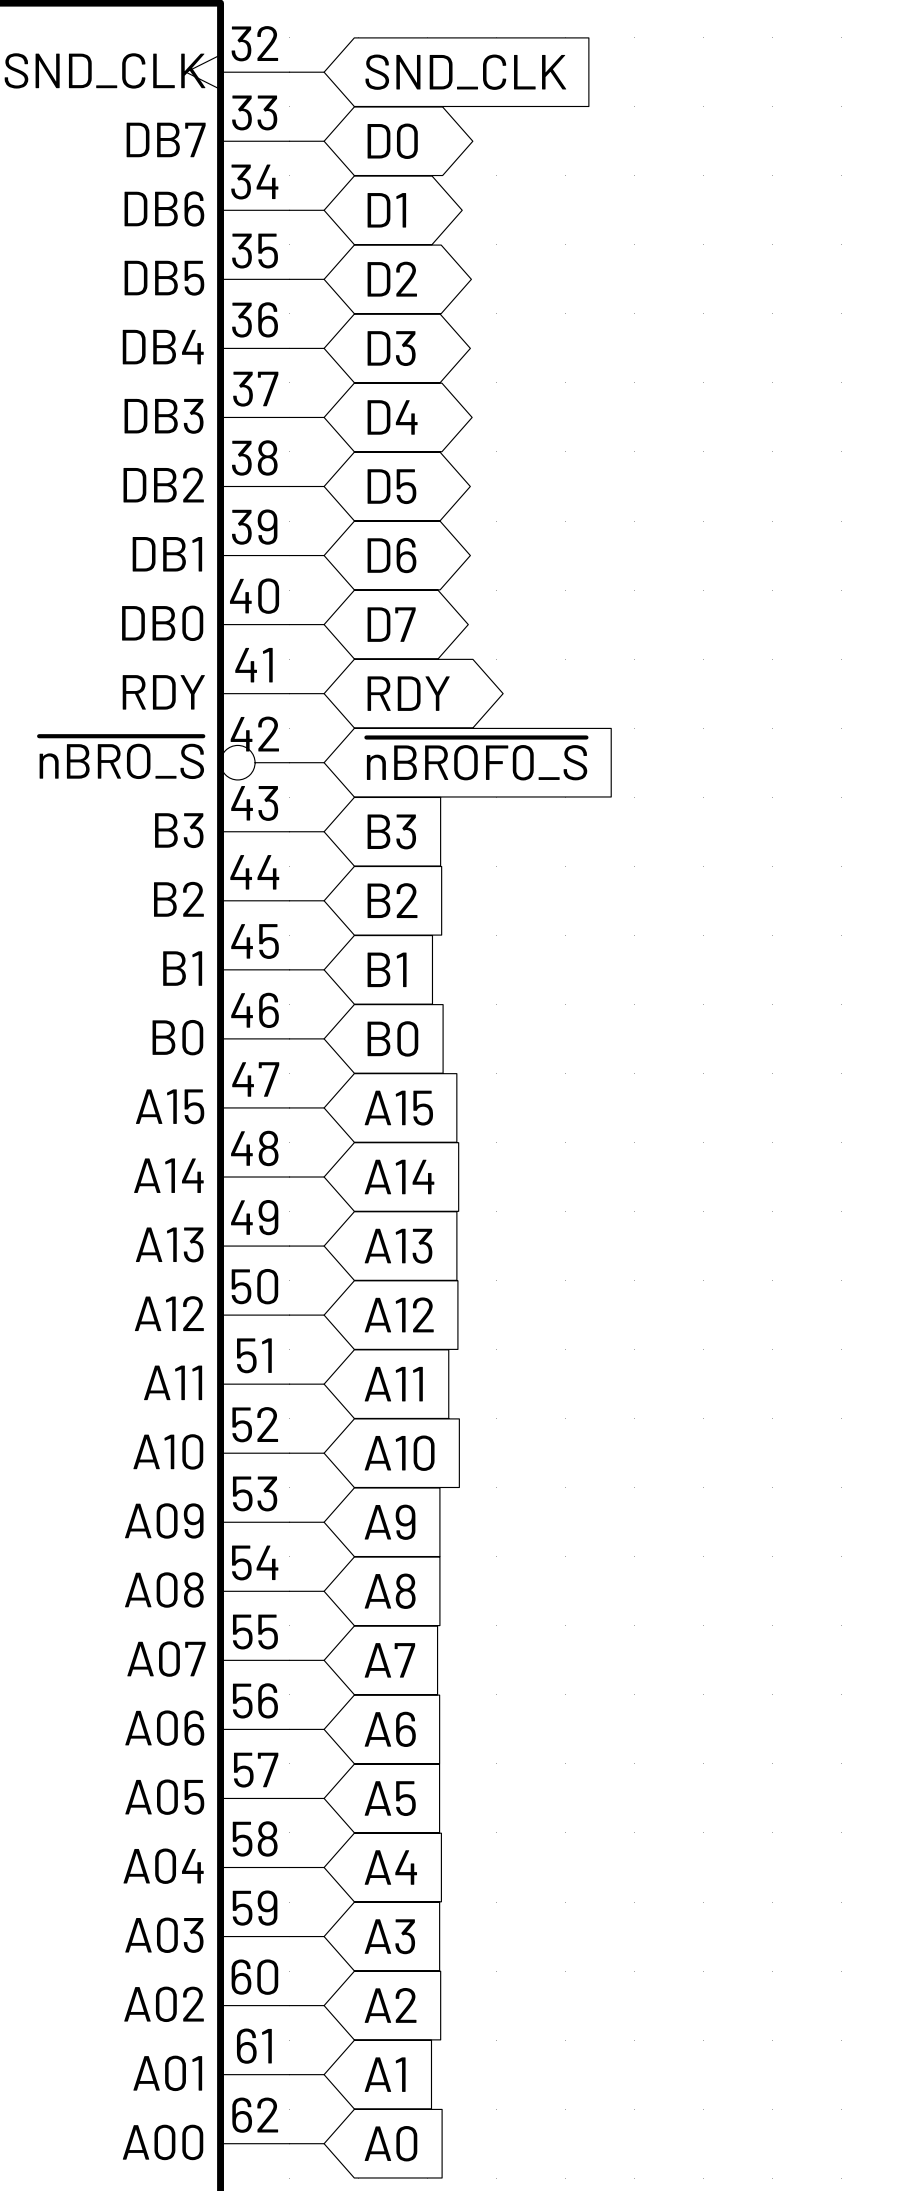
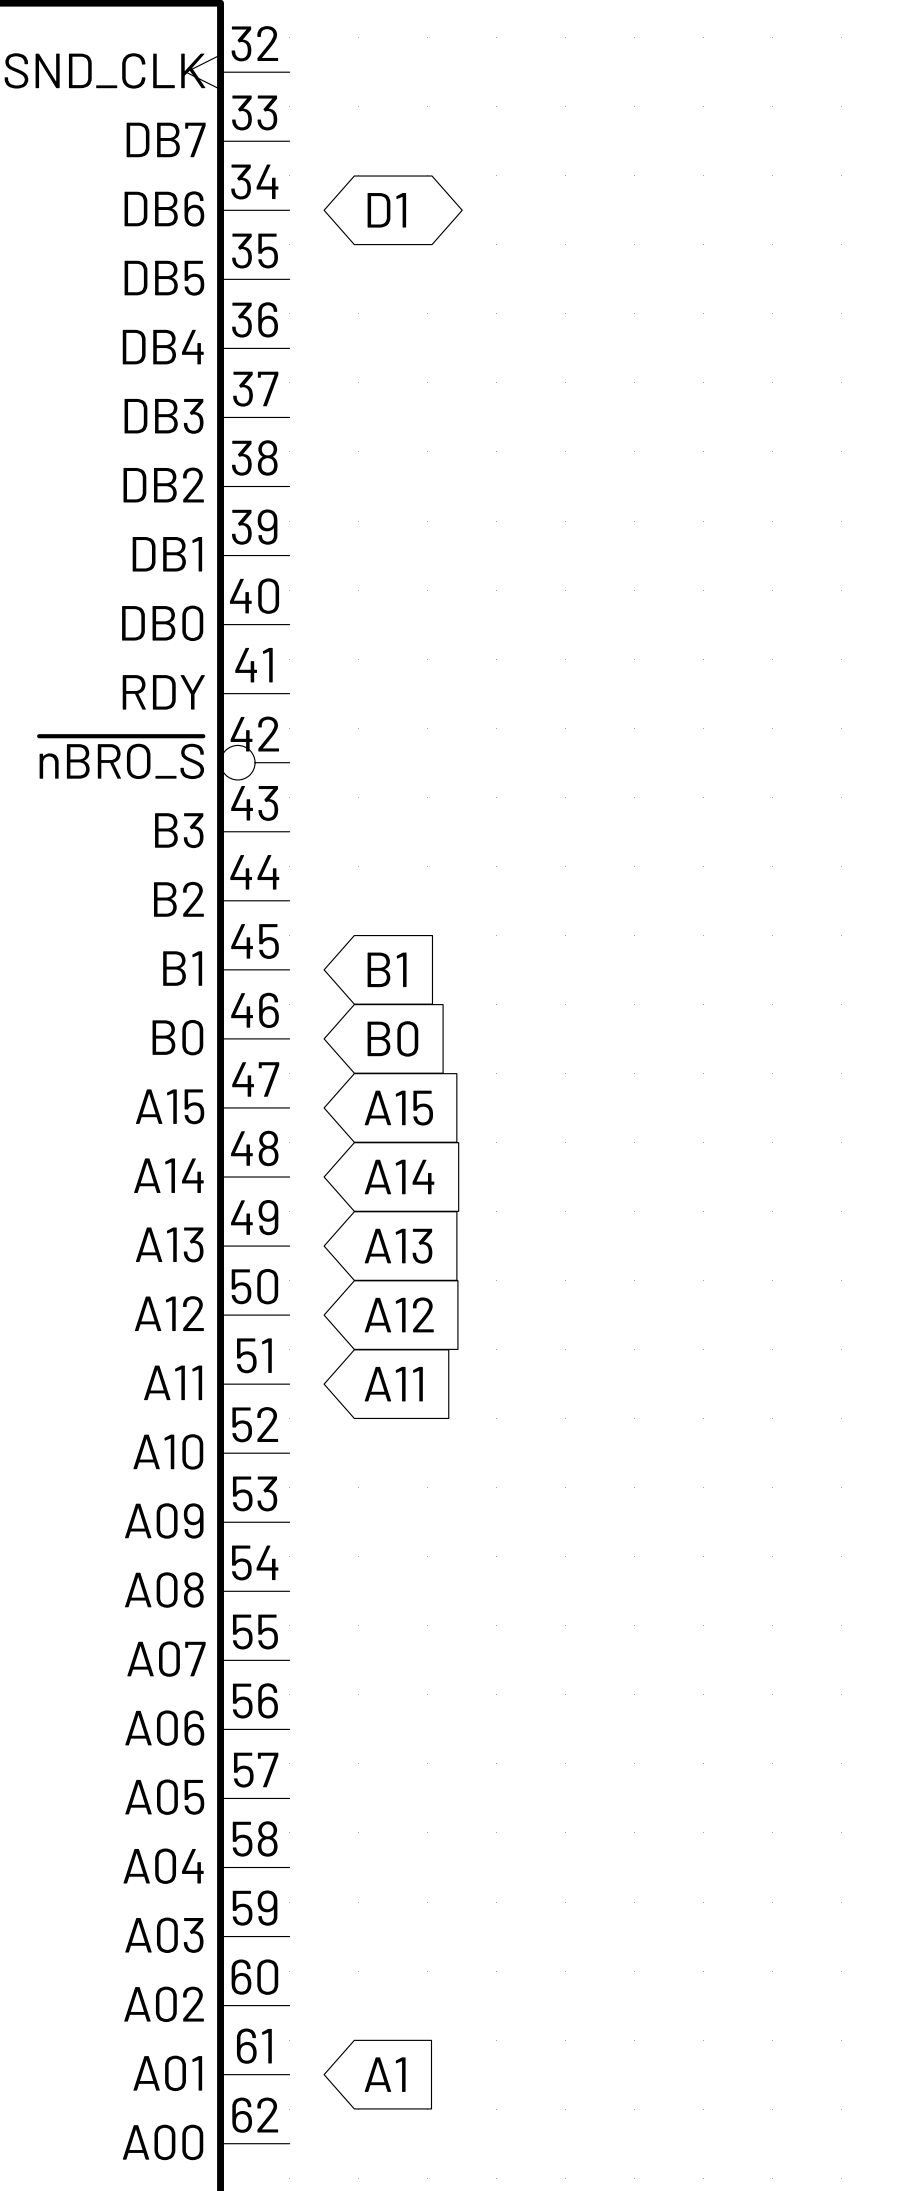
wire: (289, 72) (324, 72) -> none
global label: SND_CLK (465, 72) -> none
wire: (289, 141) (324, 141) -> none
global label: D0 (392, 141) -> none
wire: (289, 210) (324, 210) -> none
wire: (289, 279) (324, 279) -> none
global label: D2 (392, 279) -> none
wire: (289, 348) (324, 348) -> none
global label: D3 (391, 348) -> none
wire: (289, 417) (324, 417) -> none
global label: D4 (392, 417) -> none
wire: (289, 486) (324, 486) -> none
global label: D5 (391, 486) -> none
wire: (289, 555) (324, 555) -> none
global label: D6 (391, 555) -> none
wire: (289, 624) (324, 624) -> none
global label: D7 (391, 624) -> none
wire: (289, 693) (324, 693) -> none
global label: RDY (408, 693) -> none
global label: ~{nBROF0_S} (476, 758) -> none
wire: (289, 762) (324, 762) -> none
wire: (289, 831) (324, 831) -> none
global label: B3 (391, 831) -> none
wire: (289, 900) (324, 900) -> none
global label: B2 (392, 900) -> none
wire: (289, 969) (324, 969) -> none
wire: (289, 1038) (324, 1038) -> none
wire: (289, 1107) (324, 1107) -> none
wire: (289, 1177) (324, 1177) -> none
wire: (289, 1246) (324, 1246) -> none
wire: (289, 1315) (324, 1315) -> none
wire: (289, 1384) (324, 1384) -> none
wire: (289, 1453) (324, 1453) -> none
global label: A10 (399, 1453) -> none
wire: (289, 1522) (324, 1522) -> none
global label: A9 (389, 1522) -> none
wire: (289, 1591) (324, 1591) -> none
global label: A8 (390, 1591) -> none
wire: (289, 1660) (324, 1660) -> none
global label: A7 (389, 1660) -> none
wire: (289, 1729) (324, 1729) -> none
global label: A6 (390, 1729) -> none
wire: (289, 1798) (324, 1798) -> none
global label: A5 (390, 1798) -> none
wire: (289, 1867) (324, 1867) -> none
global label: A4 (390, 1867) -> none
wire: (289, 1936) (324, 1936) -> none
global label: A3 (389, 1936) -> none
wire: (289, 2005) (324, 2005) -> none
global label: A2 (390, 2005) -> none
wire: (289, 2074) (324, 2074) -> none
wire: (289, 2143) (324, 2143) -> none
global label: A0 (390, 2143) -> none

